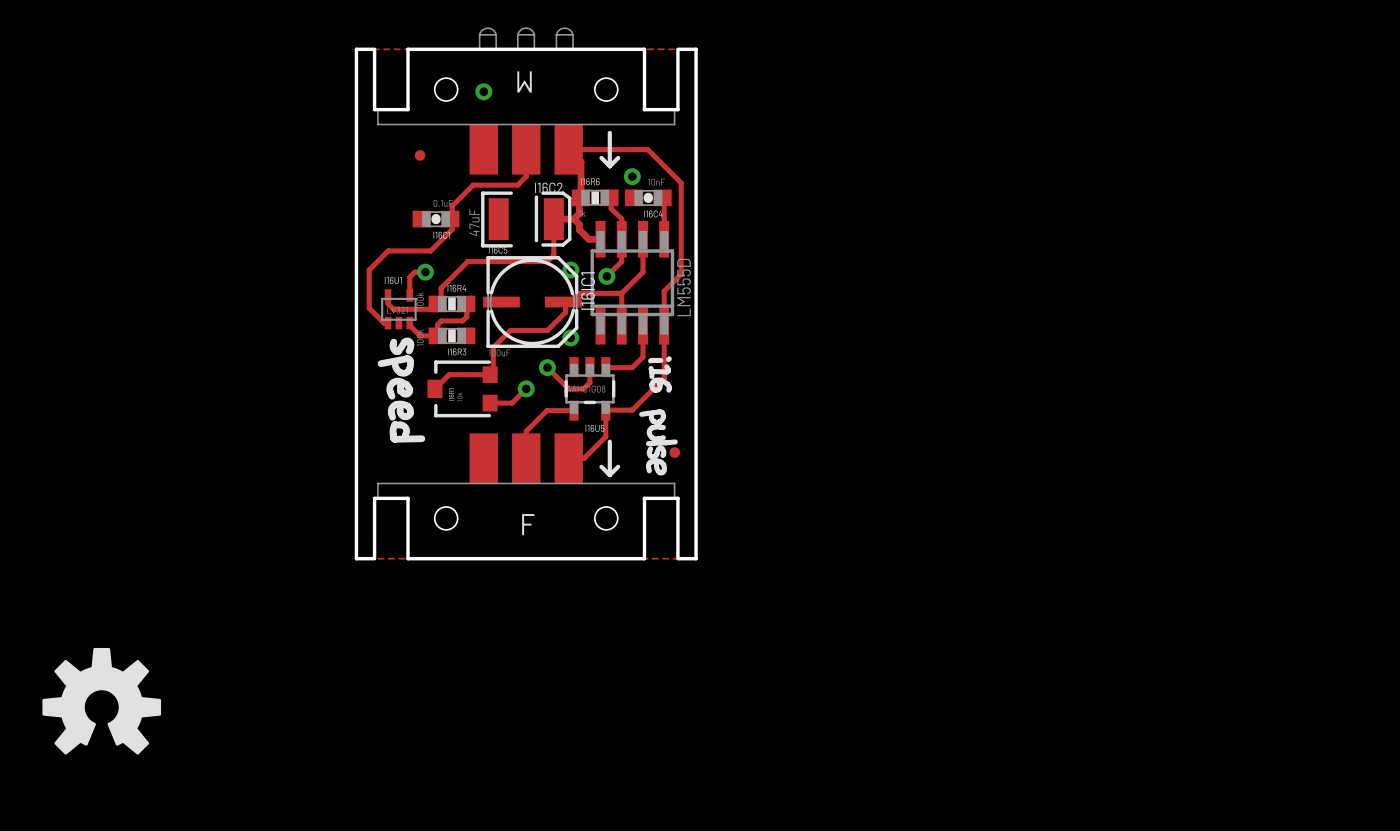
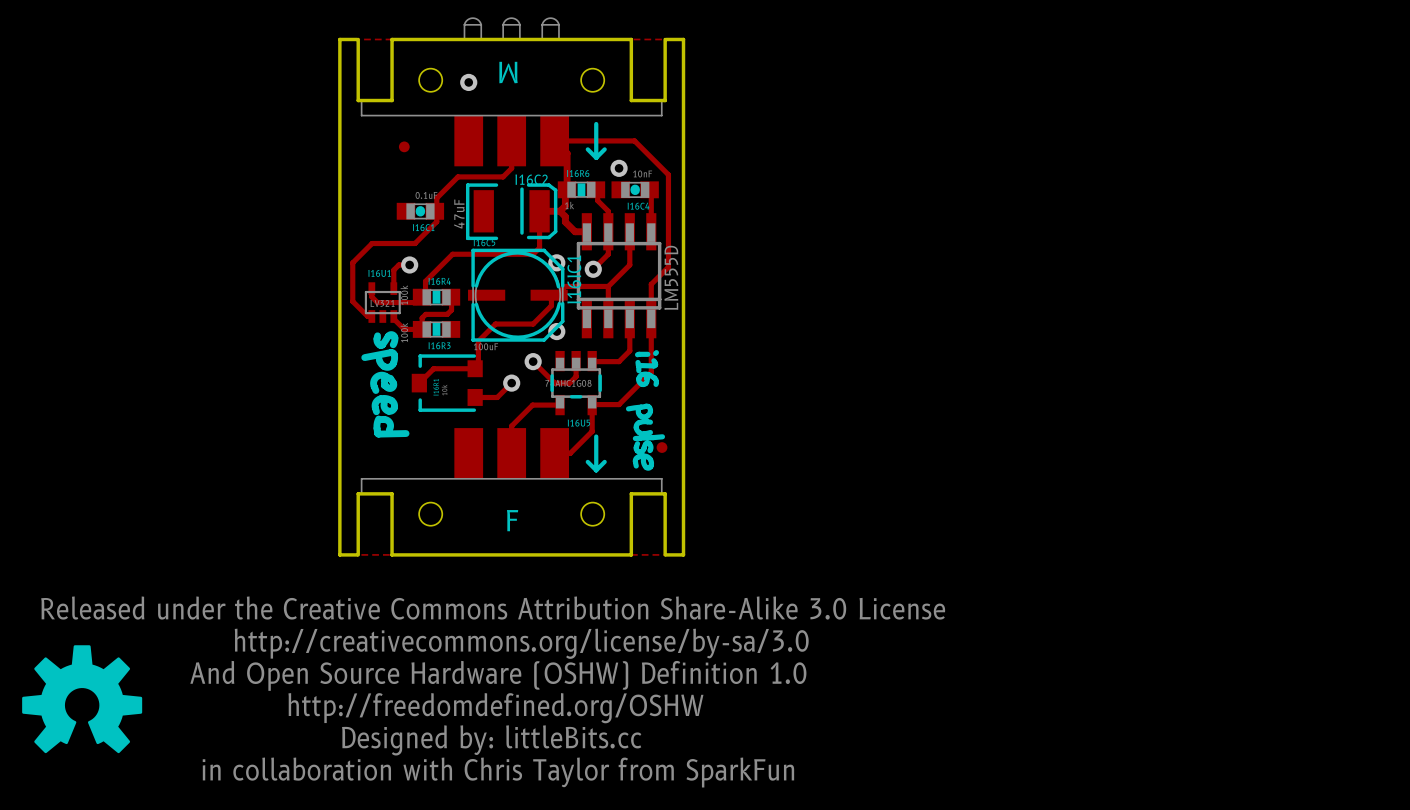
drawing: none -> [41, 596, 946, 788]

